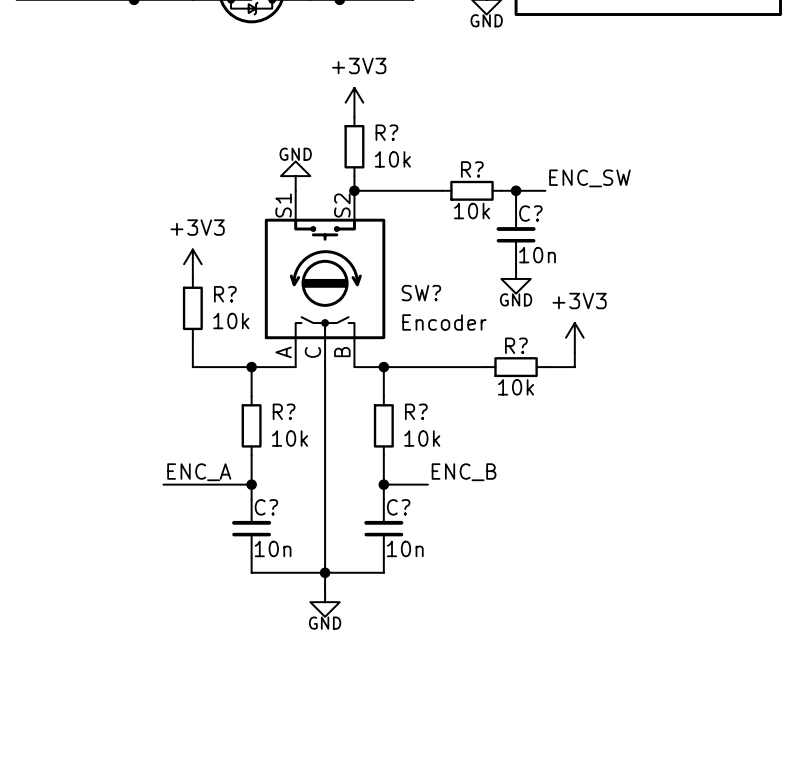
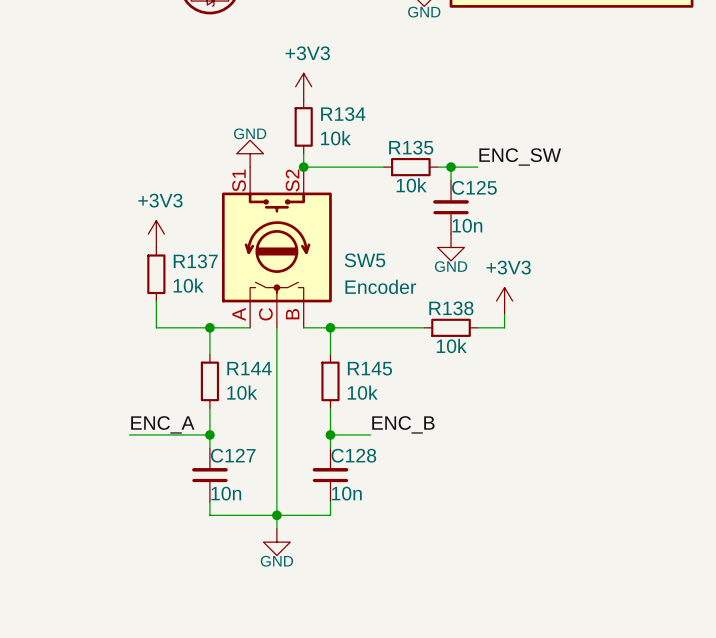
R? name: R? (386, 132) -> R134 (343, 114)
R? name: R? (472, 169) -> R135 (411, 147)
C? name: C? (530, 213) -> C125 (474, 187)
SW? name: SW? (421, 293) -> SW5 (365, 260)
R? name: R? (225, 294) -> R137 (195, 261)
R? name: R? (516, 345) -> R138 (451, 308)
R? name: R? (284, 411) -> R144 (249, 368)
R? name: R? (416, 411) -> R145 (369, 368)
C? name: C? (266, 507) -> C127 (233, 455)
C? name: C? (398, 507) -> C128 (353, 455)

